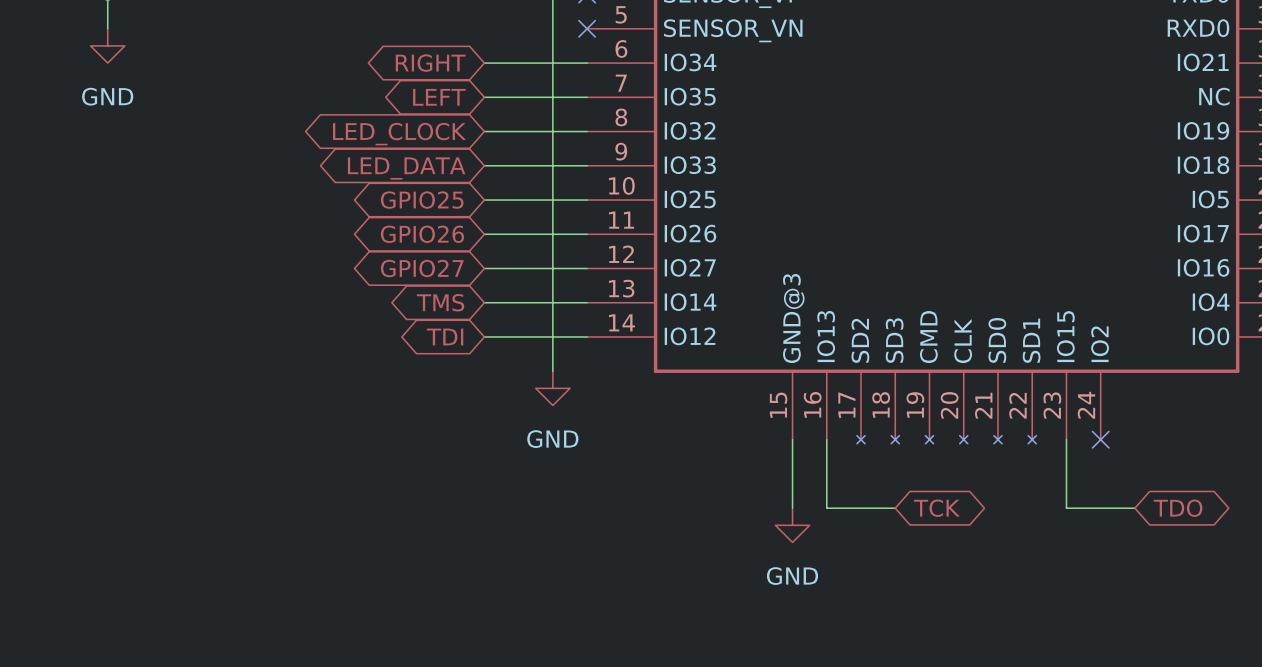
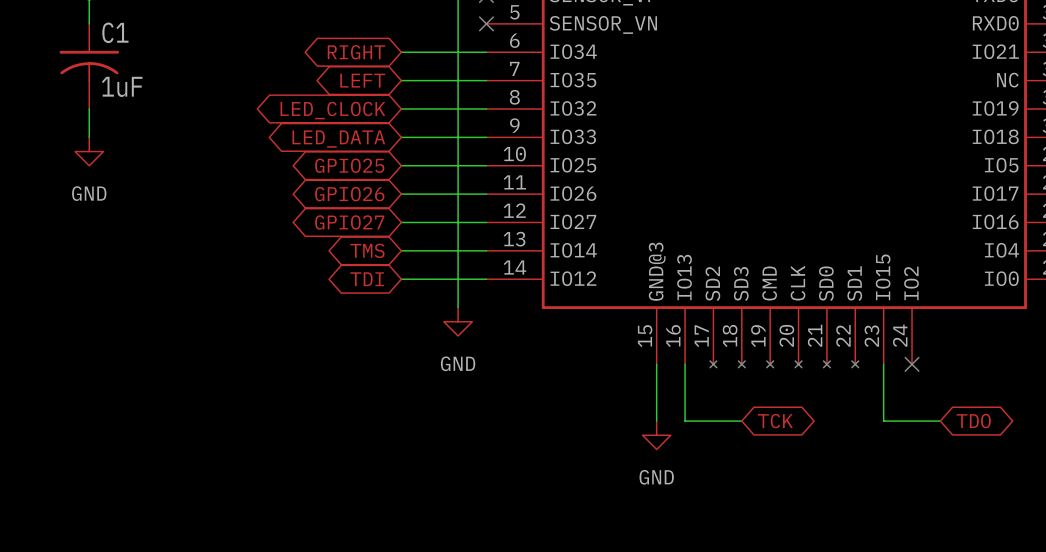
power symbol position: GND (107, 45) -> GND (89, 151)
C1: none -> 1uF (89, 66)
wire: none -> (89, 109) (89, 137)

